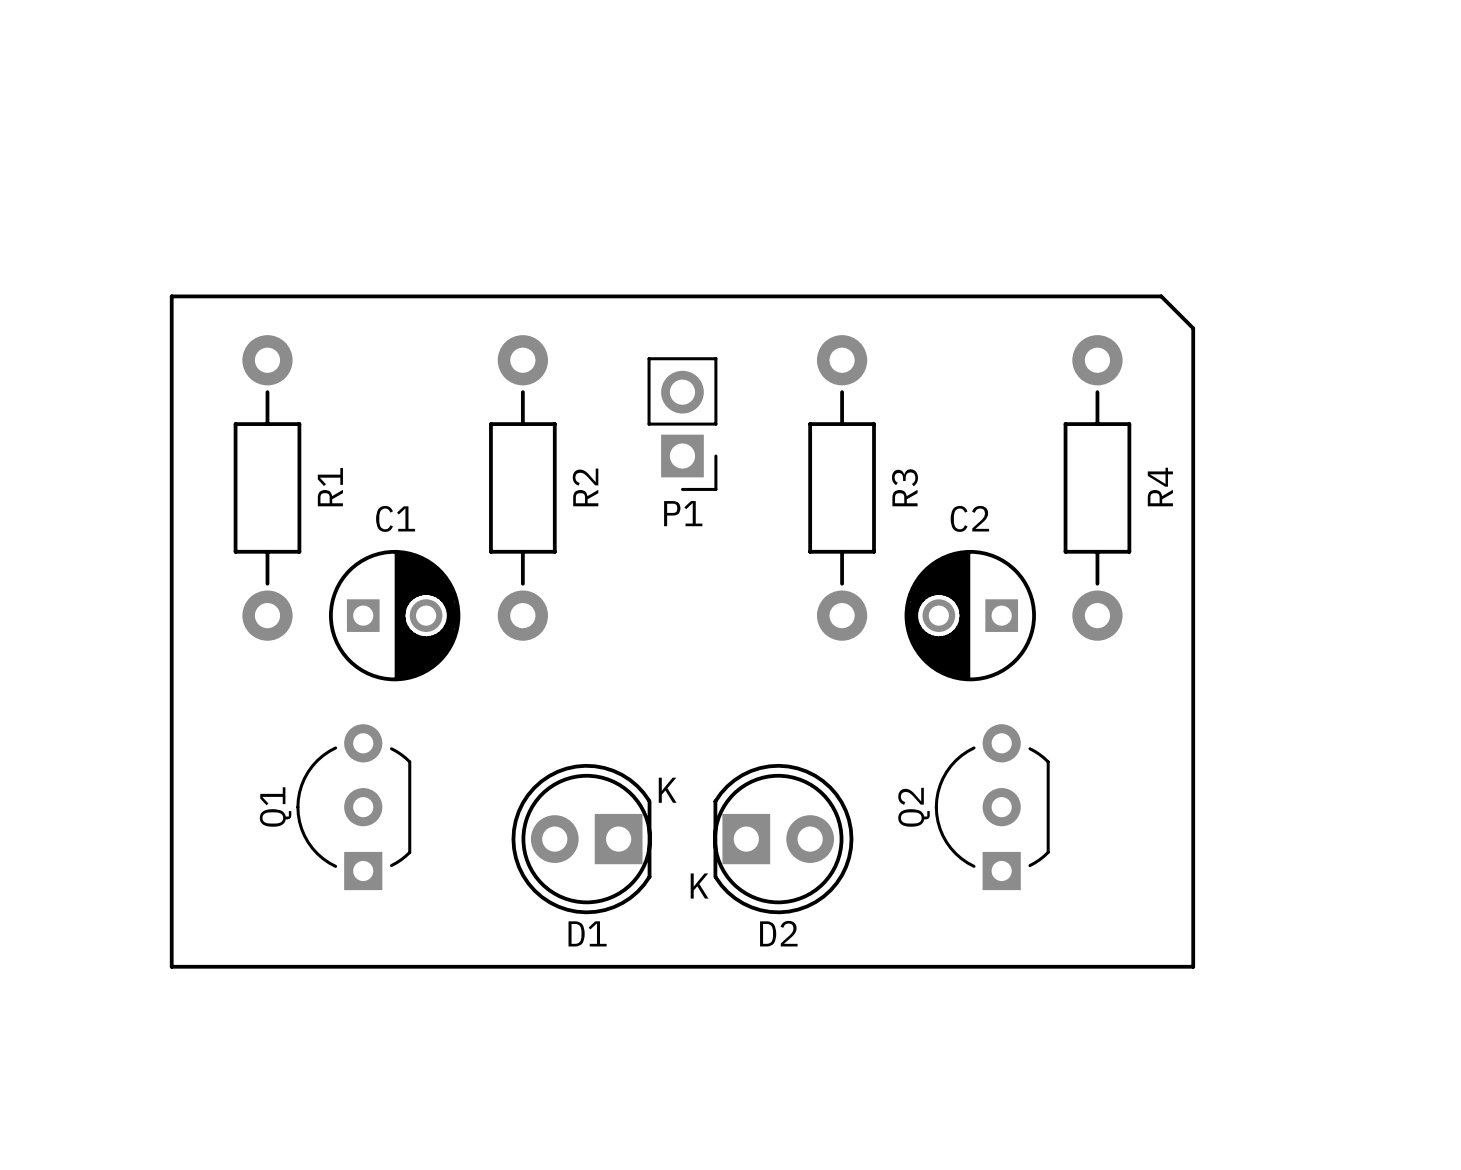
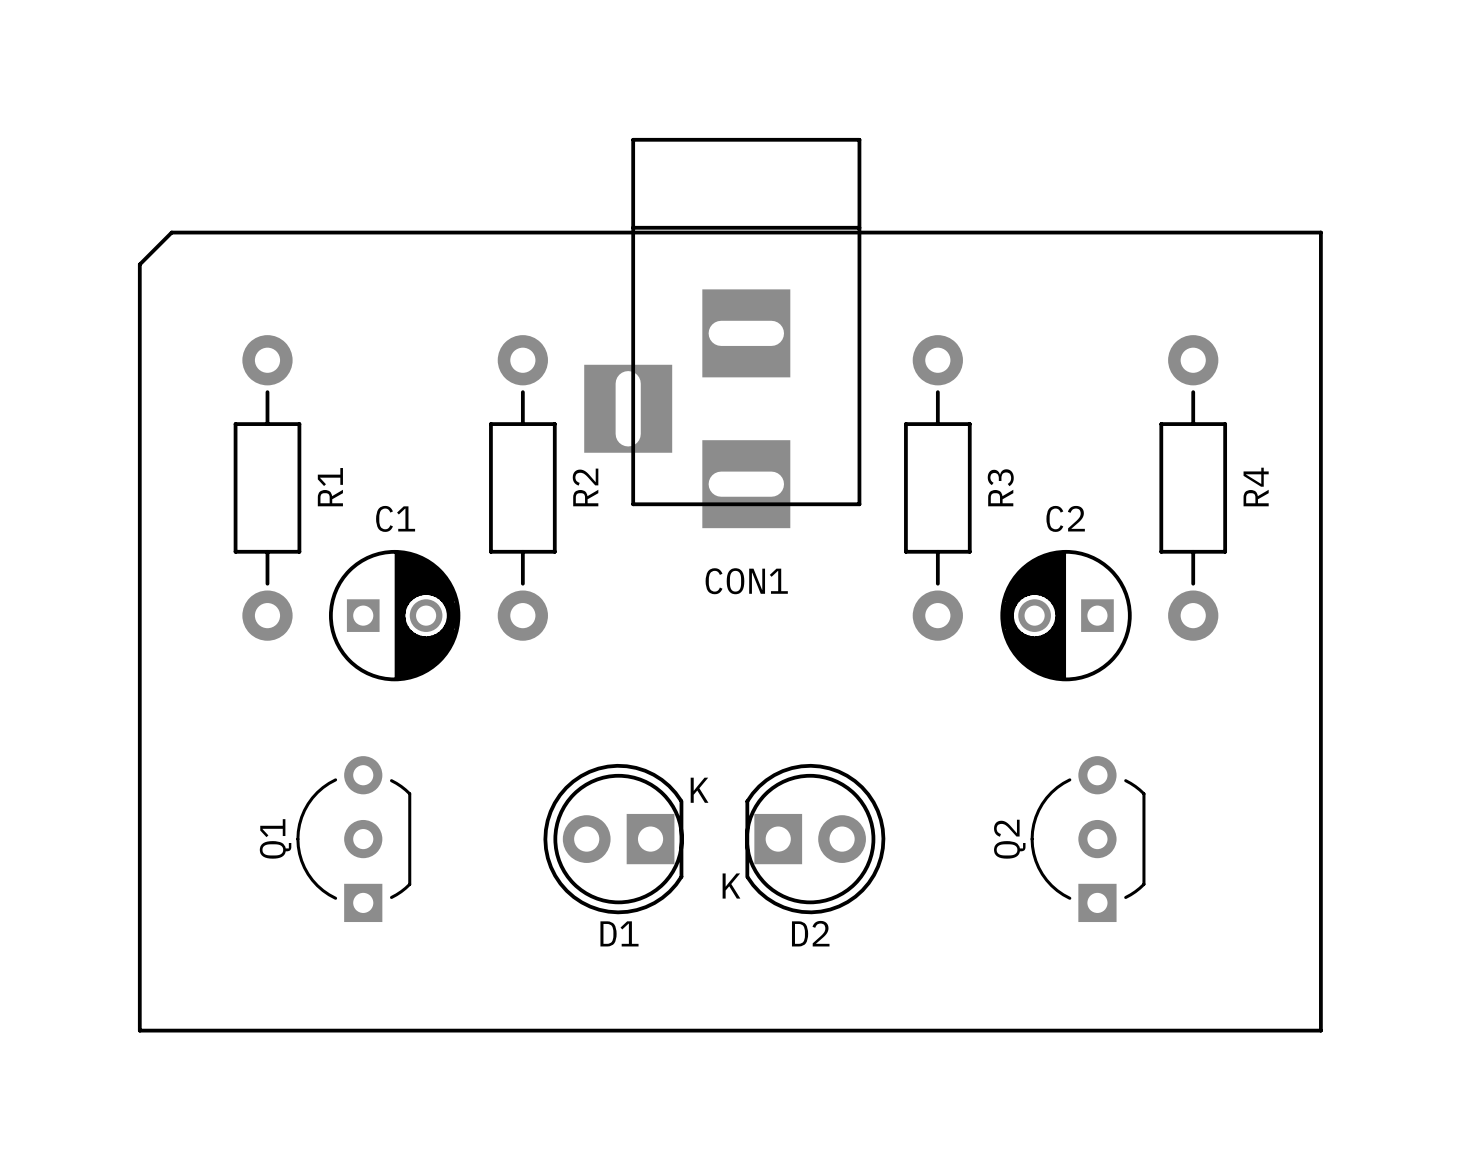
board edge: (171, 296) (171, 966) (1193, 966) (1193, 328) (1161, 296) (171, 296) -> (171, 232) (139, 264) (139, 1030) (1320, 1030) (1320, 232) (171, 232)
CON1: none -> (722, 333)
P1: (682, 424) -> none
R3 position: (842, 487) -> (937, 487)
R4 position: (1097, 487) -> (1193, 487)
C2 position: (970, 615) -> (1066, 615)
Q1 position: (353, 807) -> (353, 839)
Q2 position: (992, 807) -> (1088, 839)
D1 position: (581, 839) -> (613, 839)
D2 position: (783, 839) -> (815, 839)

